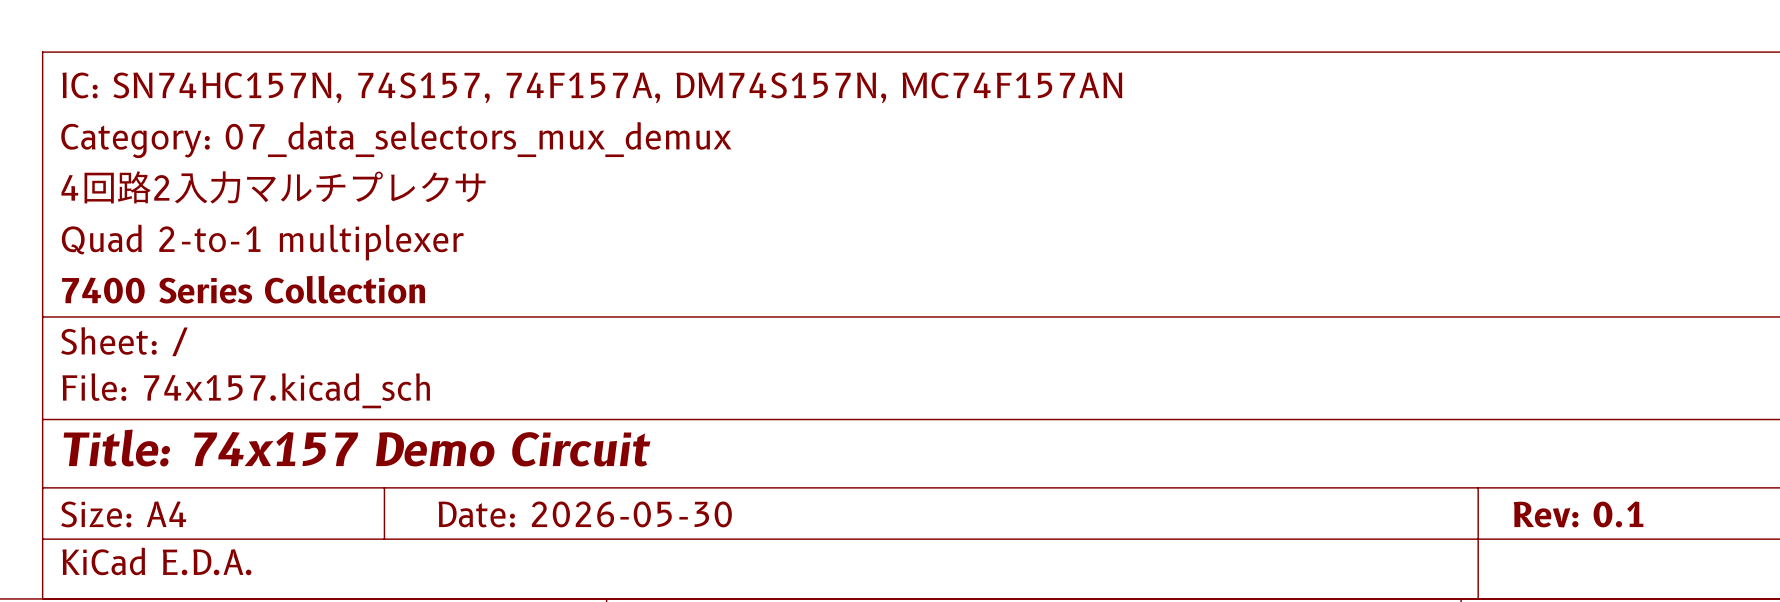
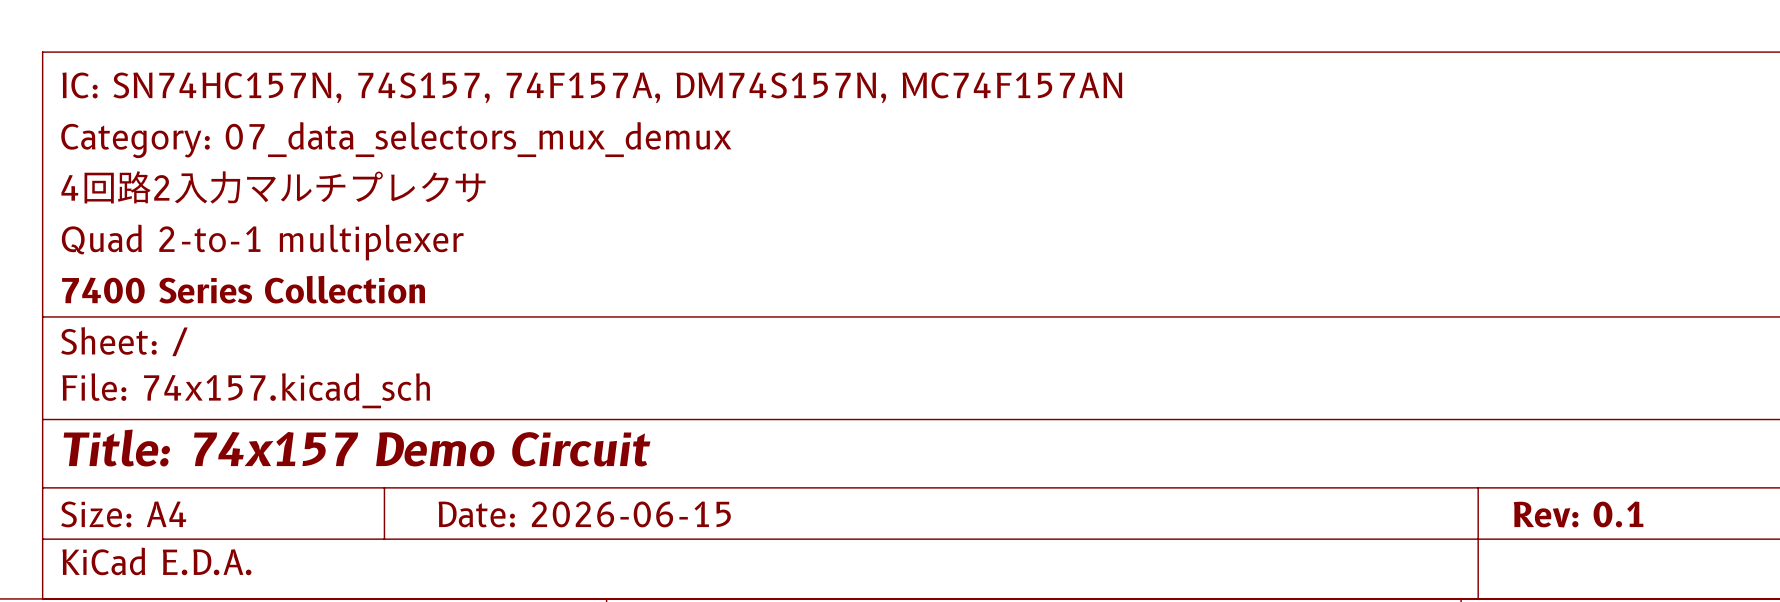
title block: Date: 2026-05-30 (585, 514) -> Date: 2026-06-15 (584, 514)

